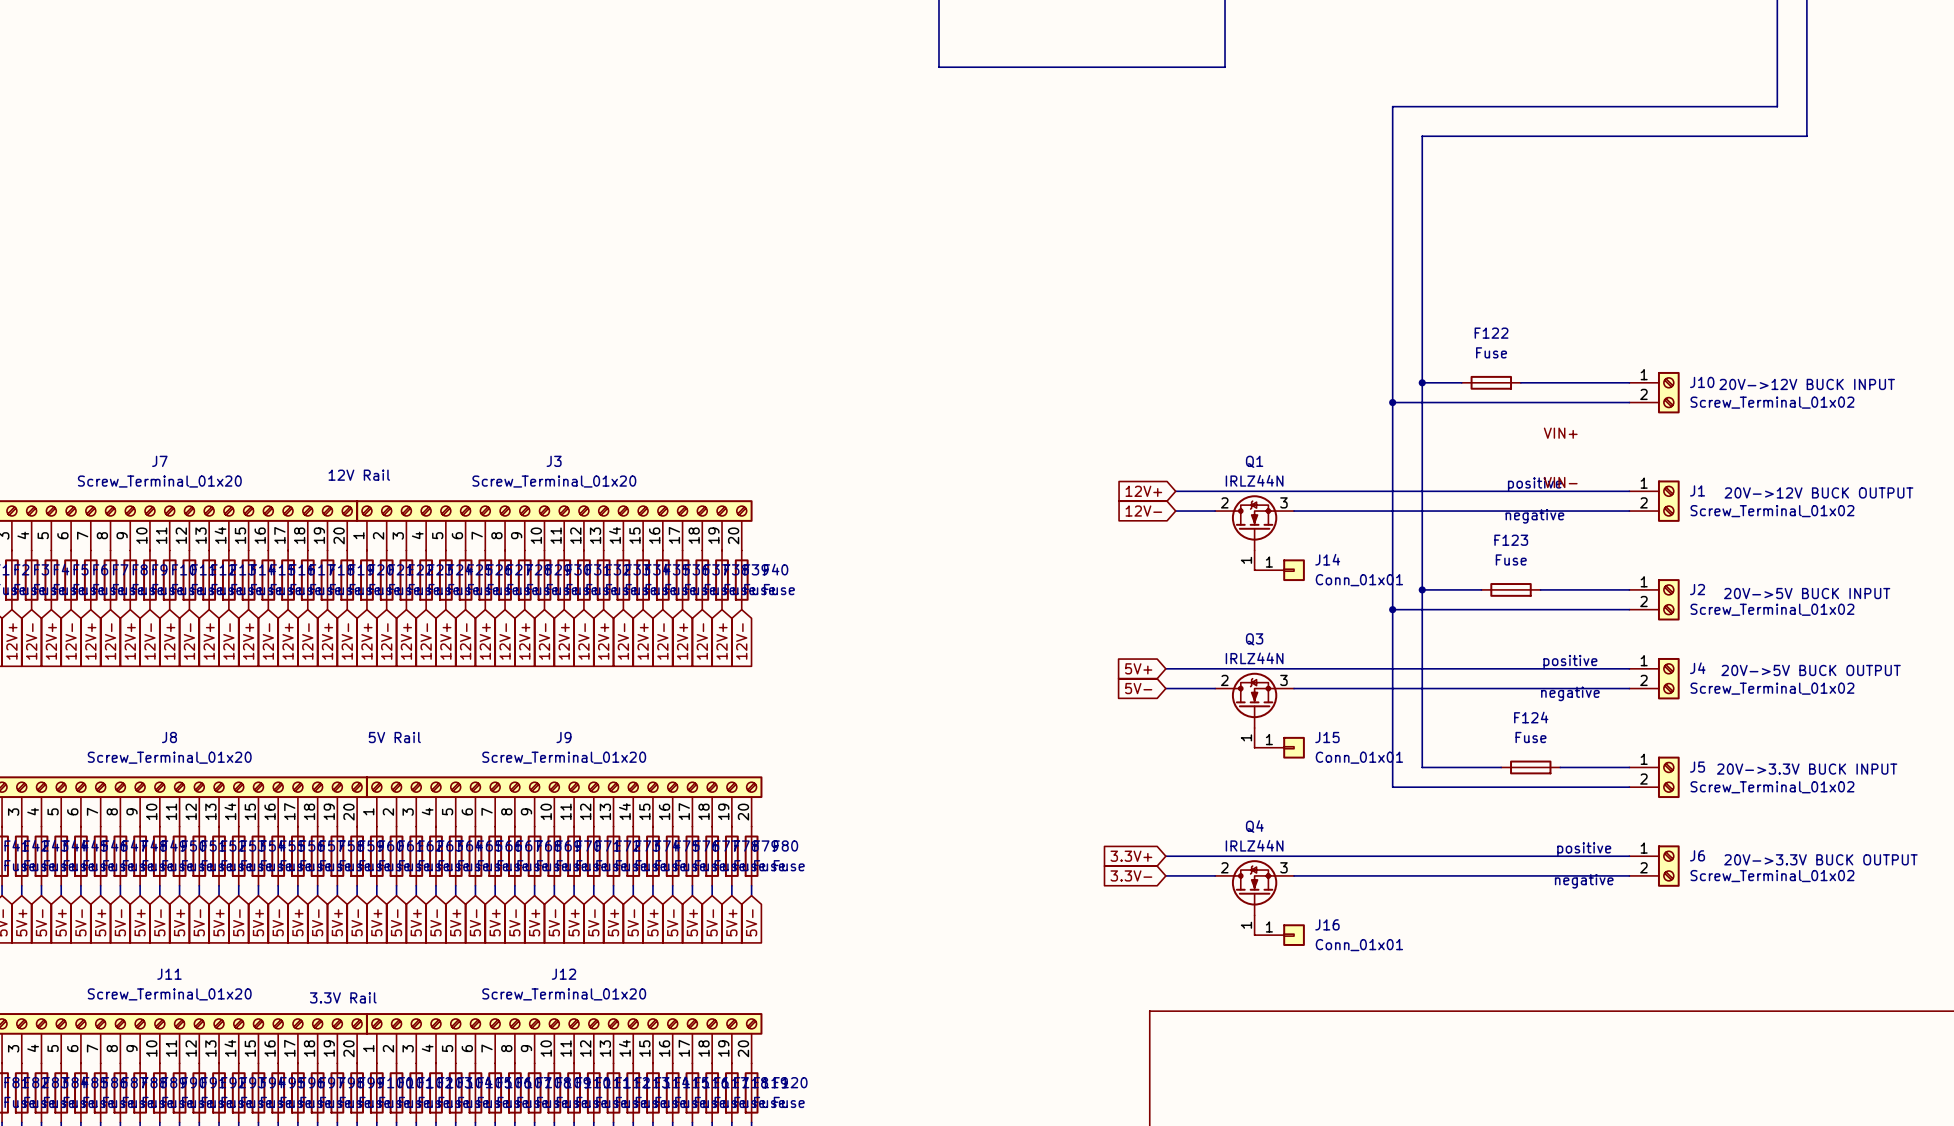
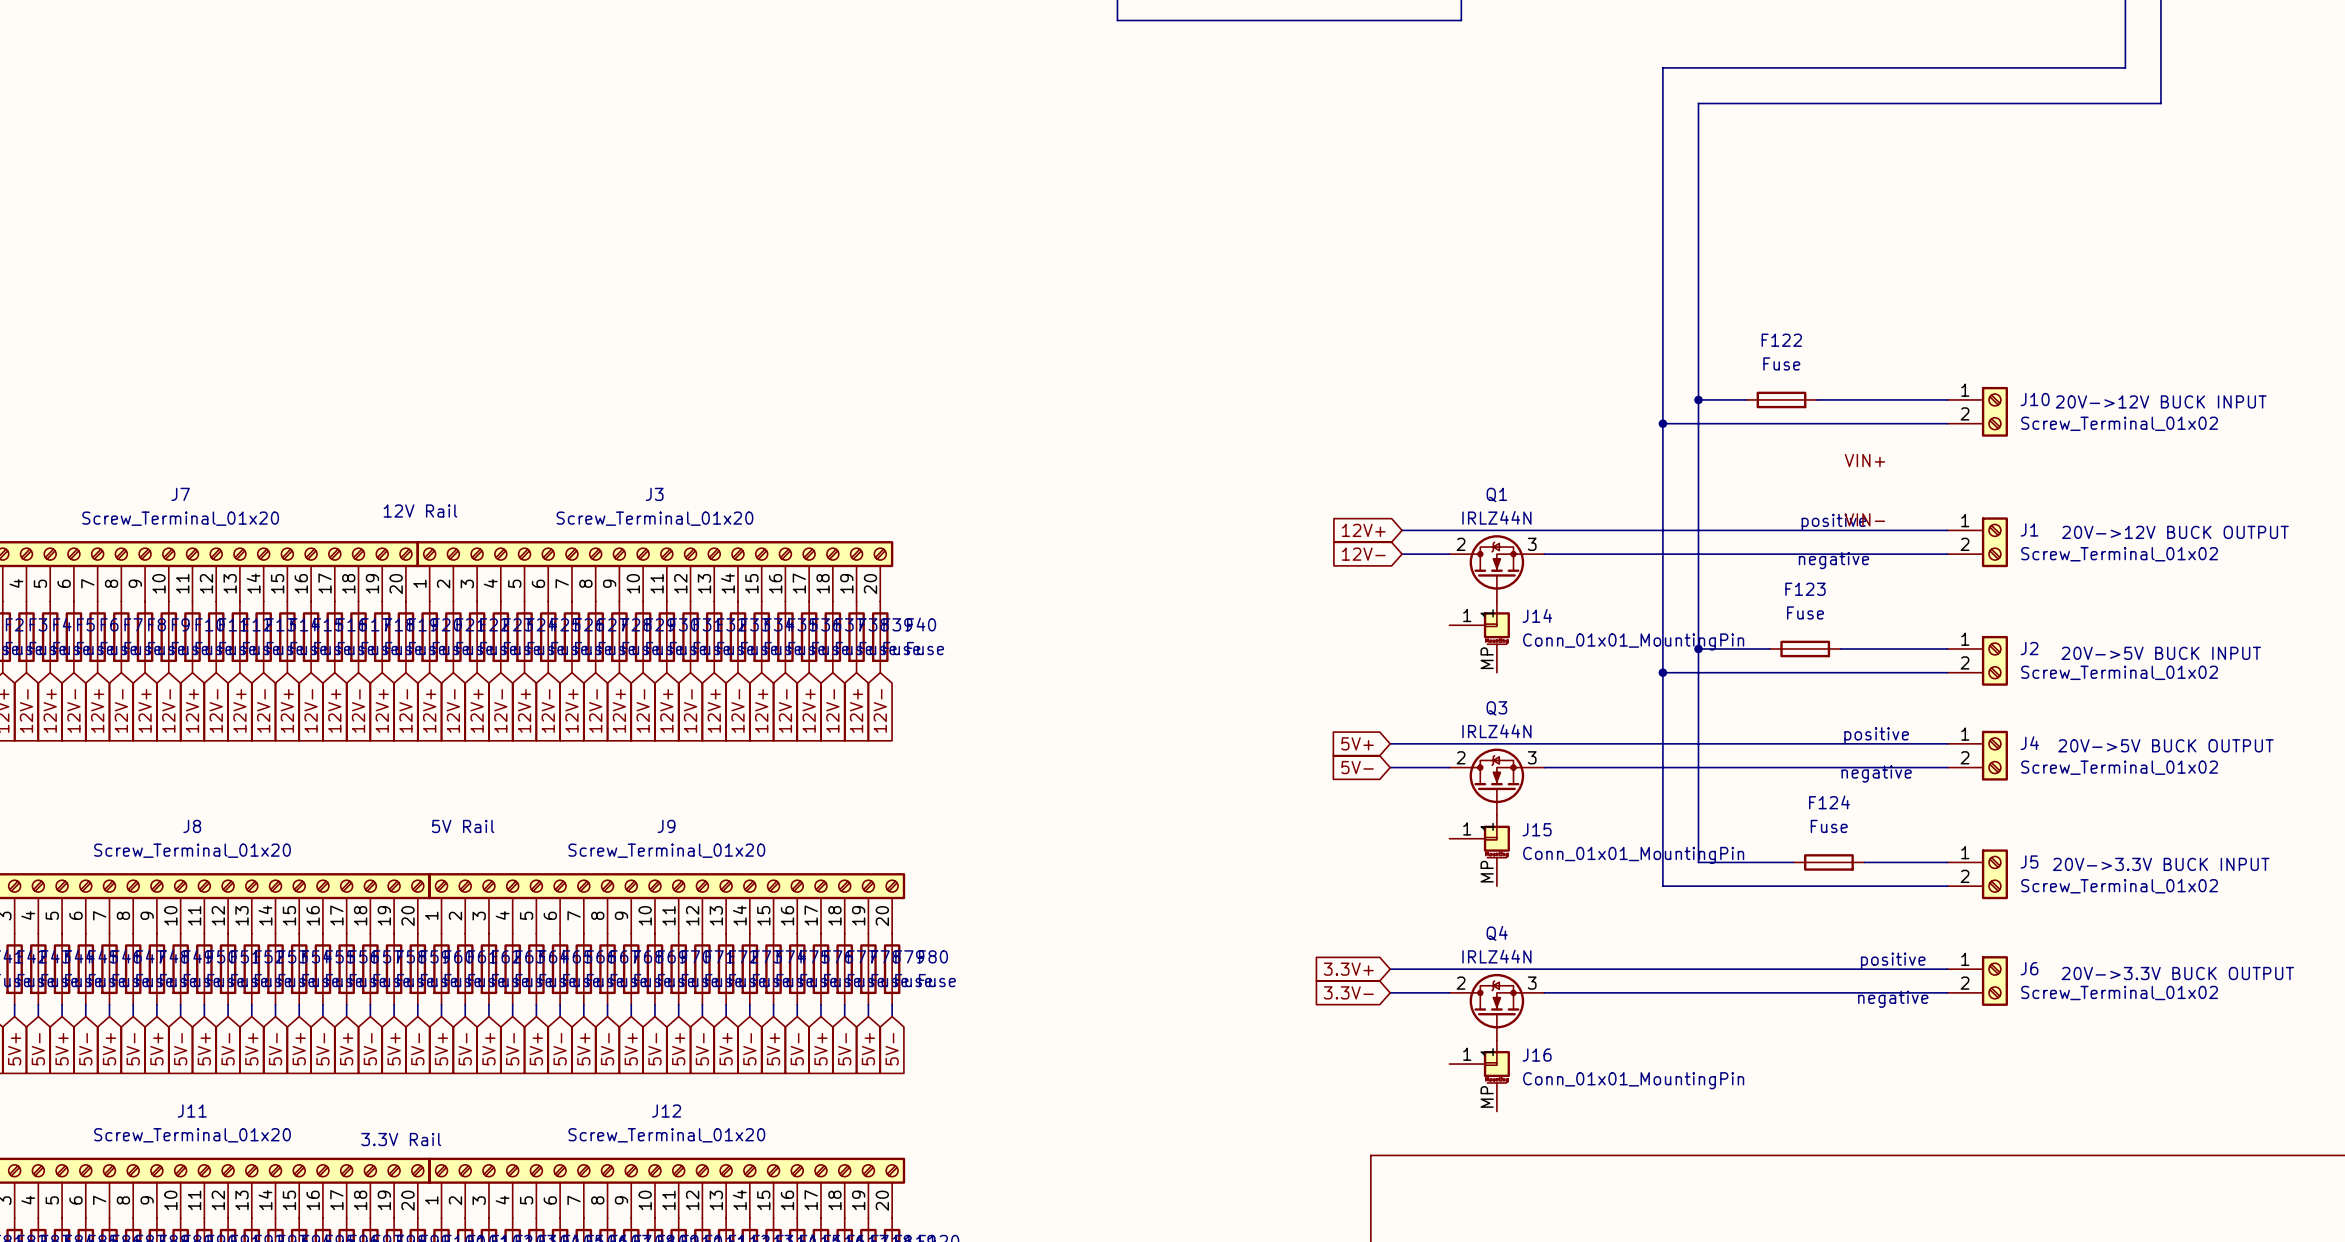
J14 symbol: [1254, 559, 1305, 582] -> [1449, 612, 1510, 673]
J14 value: Conn_01x01 (1359, 580) -> Conn_01x01_MountingPin (1633, 641)
J15 symbol: [1254, 736, 1305, 759] -> [1449, 825, 1510, 887]
J15 value: Conn_01x01 (1359, 757) -> Conn_01x01_MountingPin (1633, 855)
J16 symbol: [1254, 924, 1305, 946] -> [1449, 1050, 1510, 1112]
J16 value: Conn_01x01 (1359, 945) -> Conn_01x01_MountingPin (1633, 1080)

